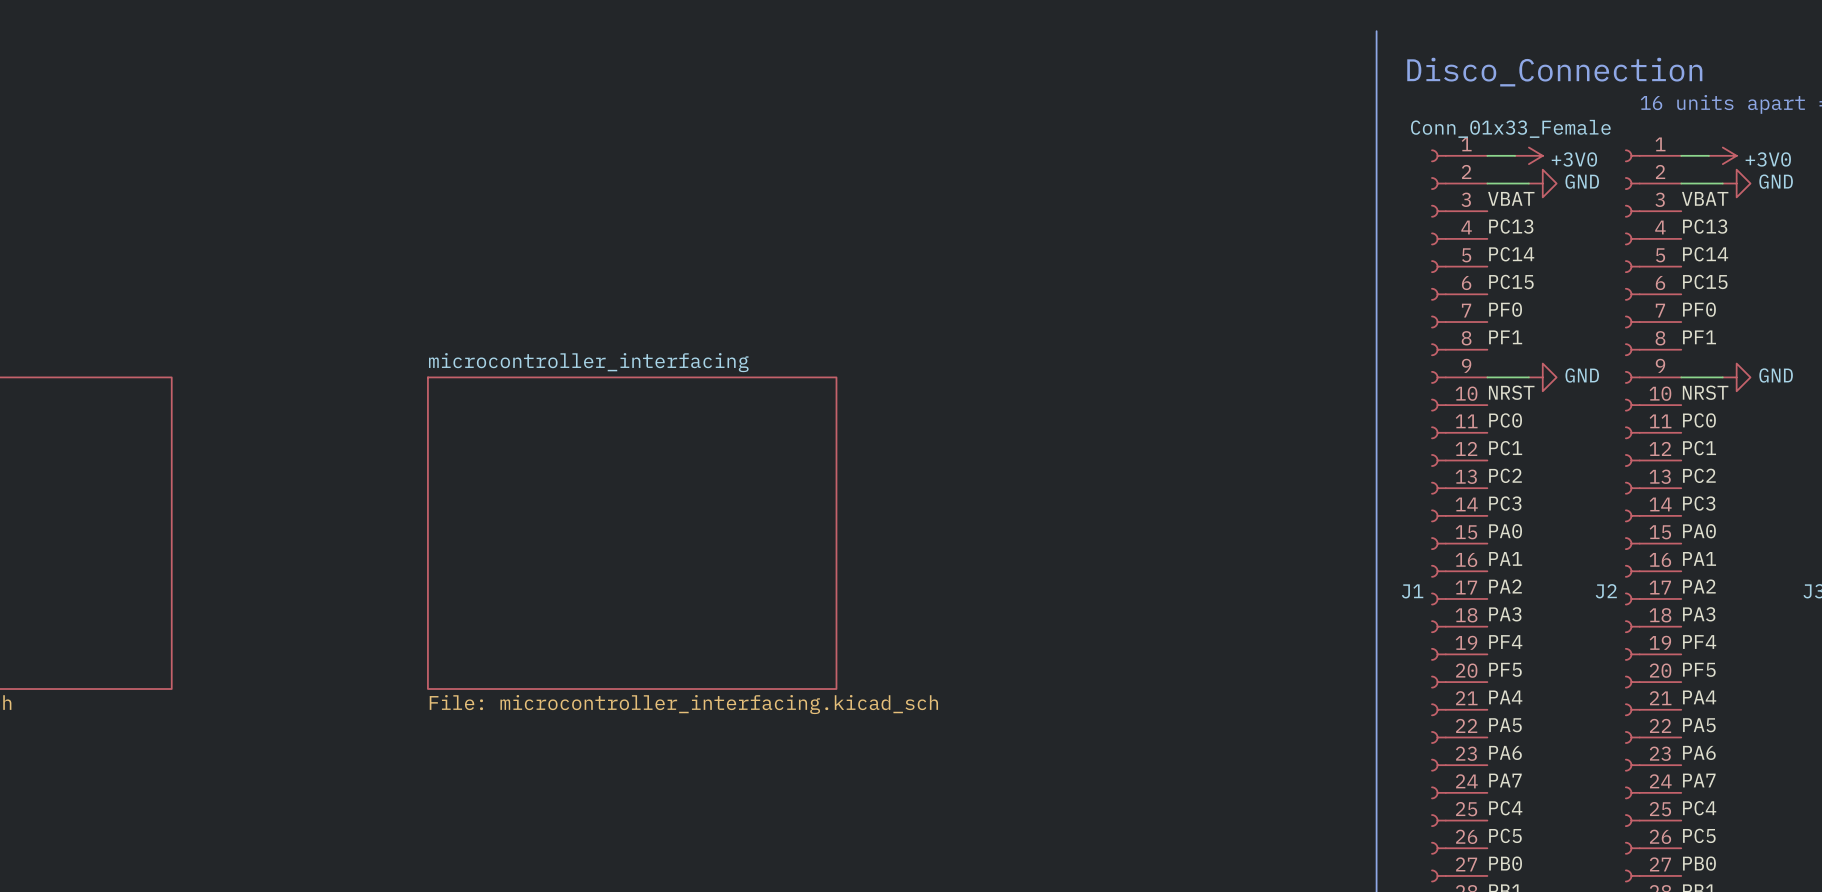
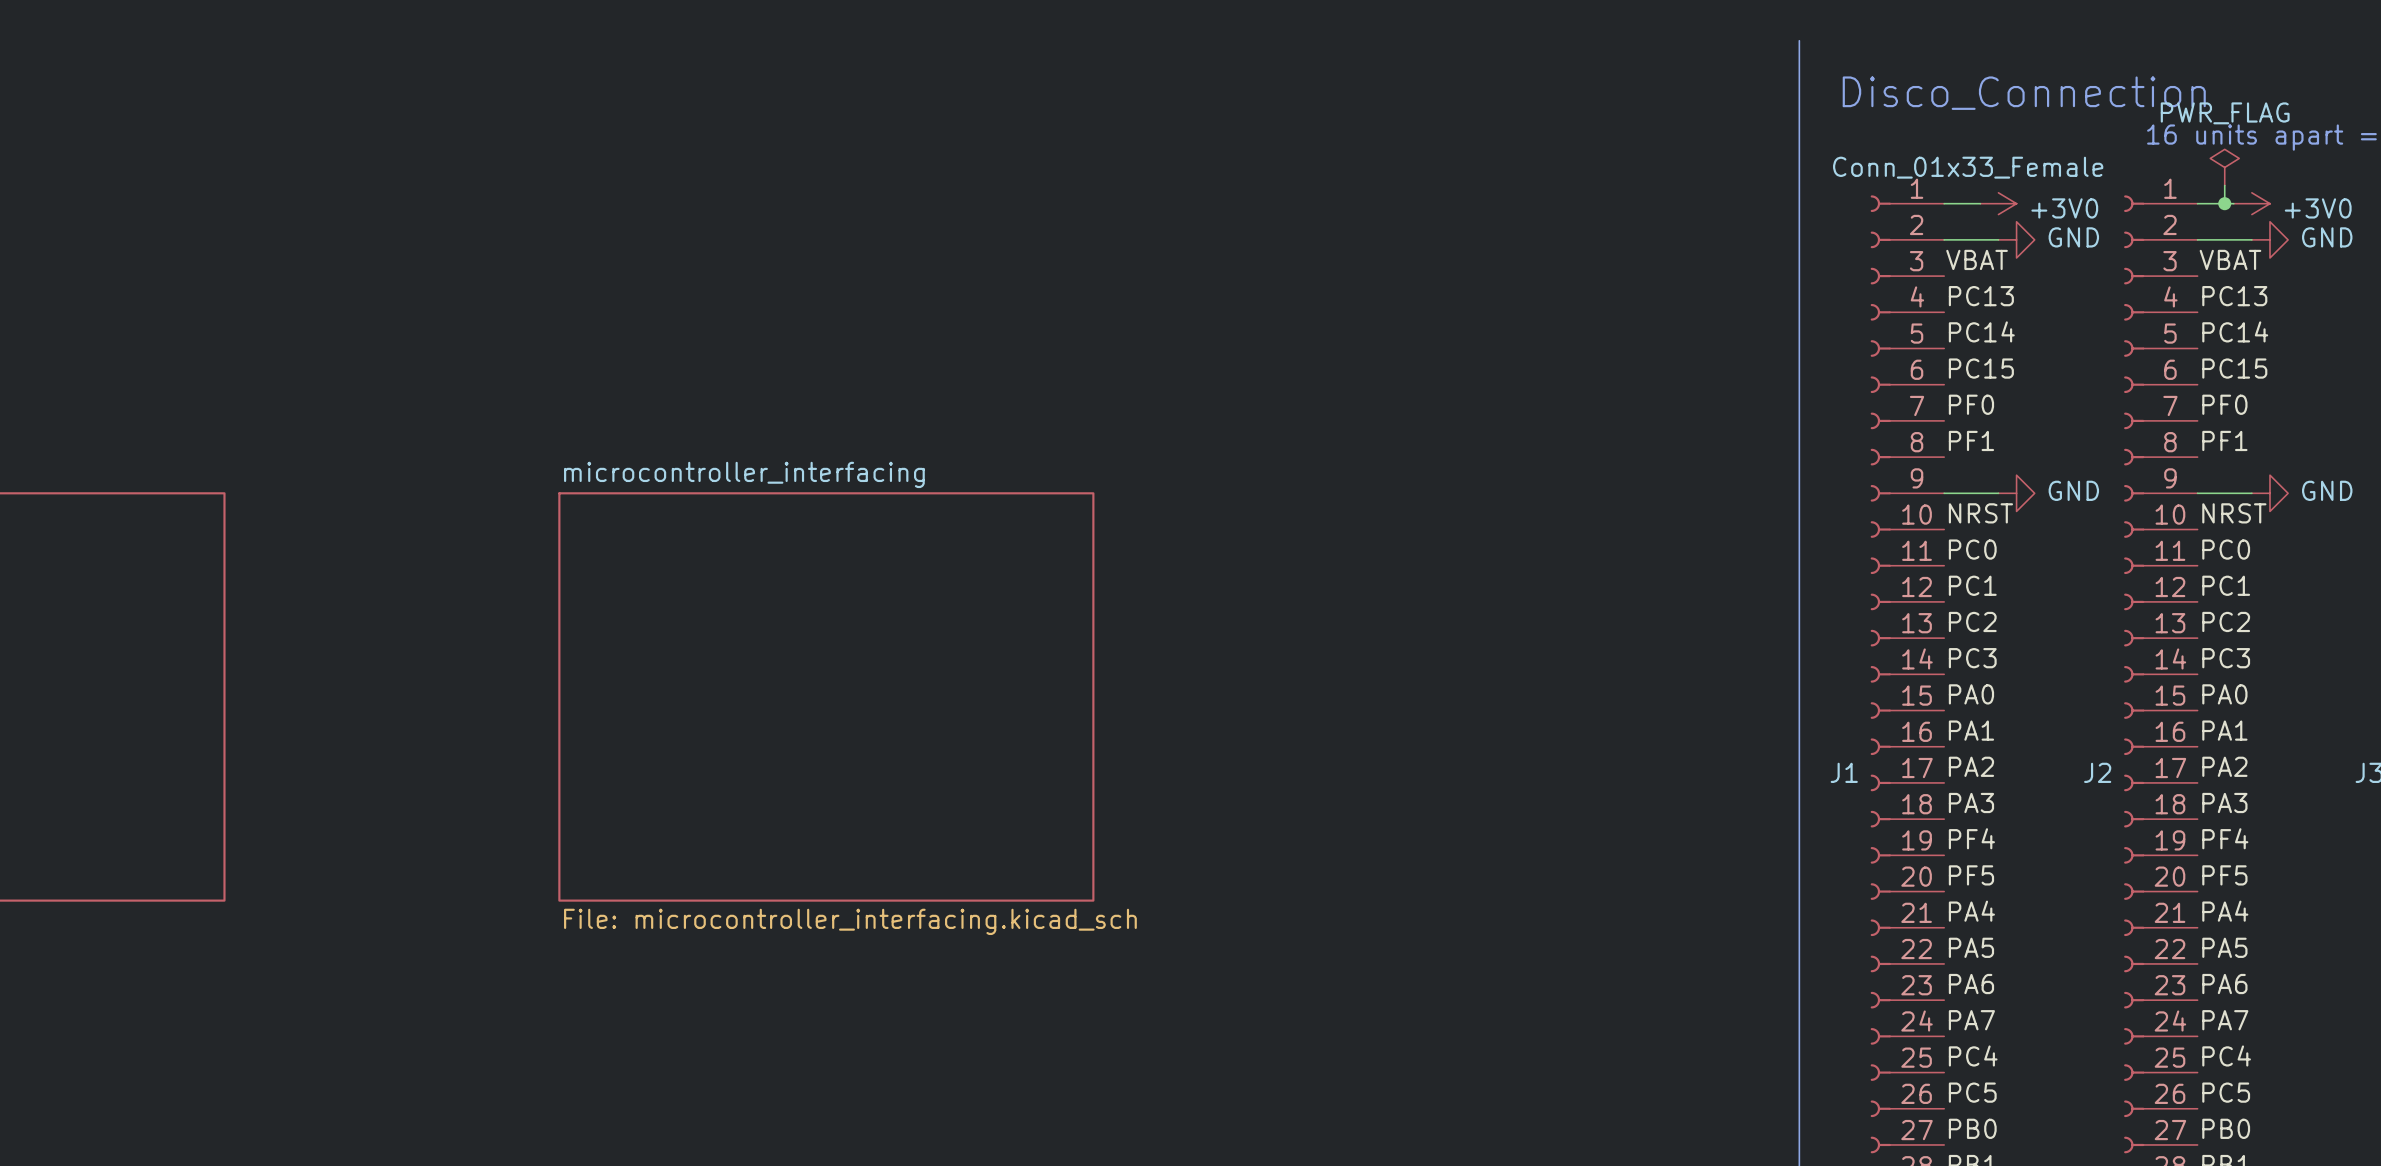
power symbol: none -> PWR_FLAG (2224, 167)
wire: none -> (2224, 185) (2224, 203)
junction: none -> (2224, 203)

